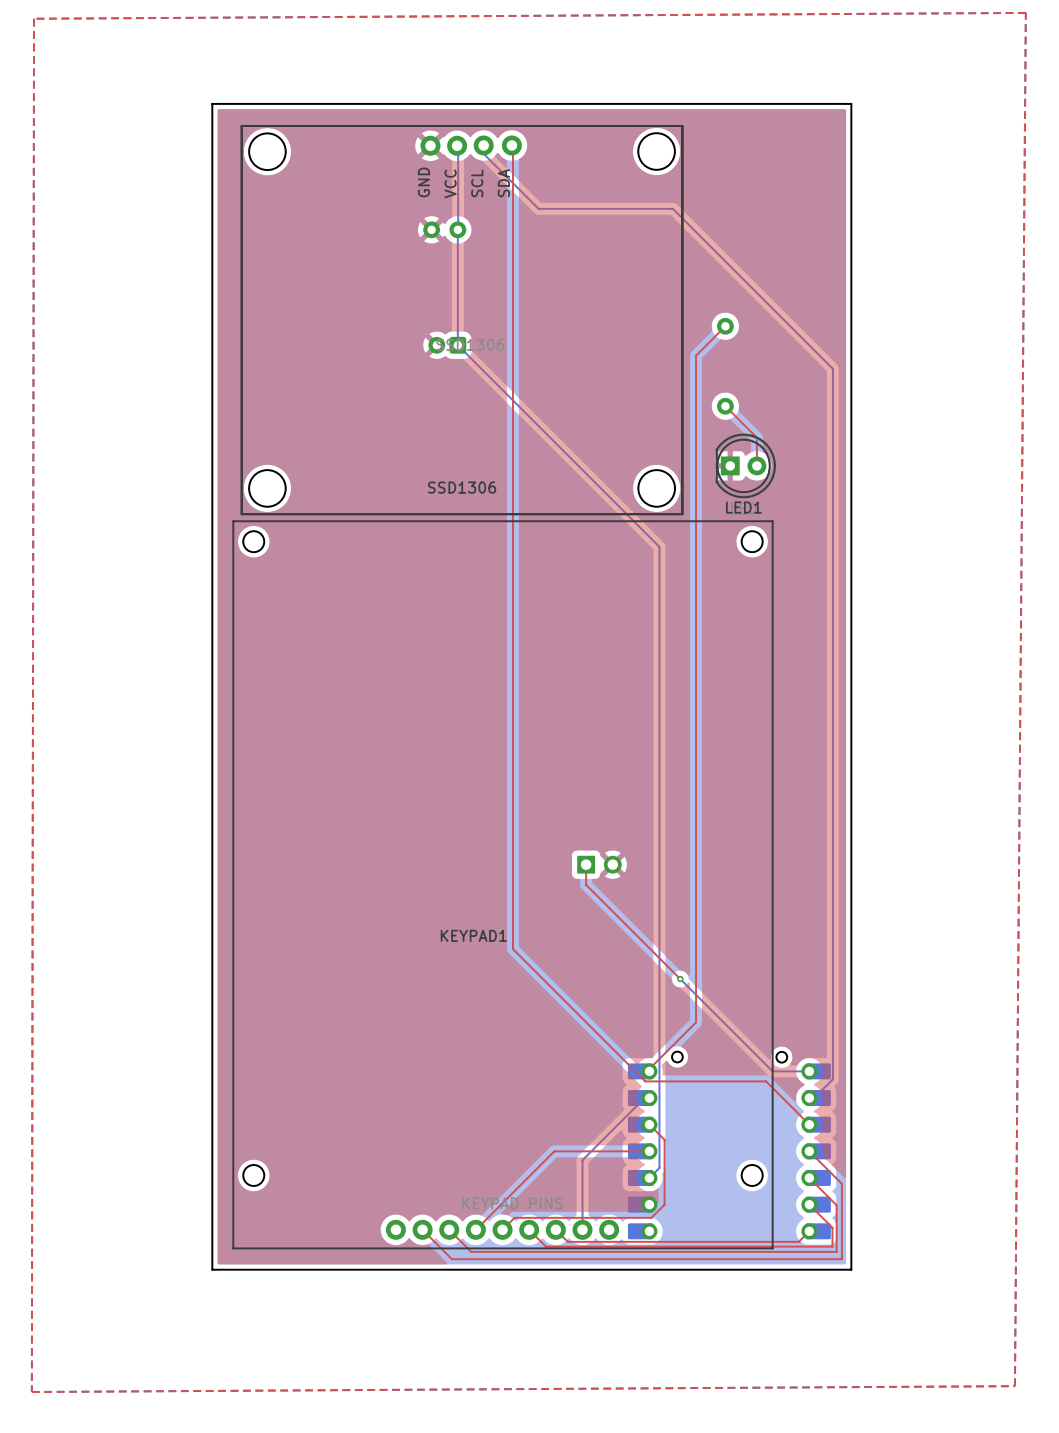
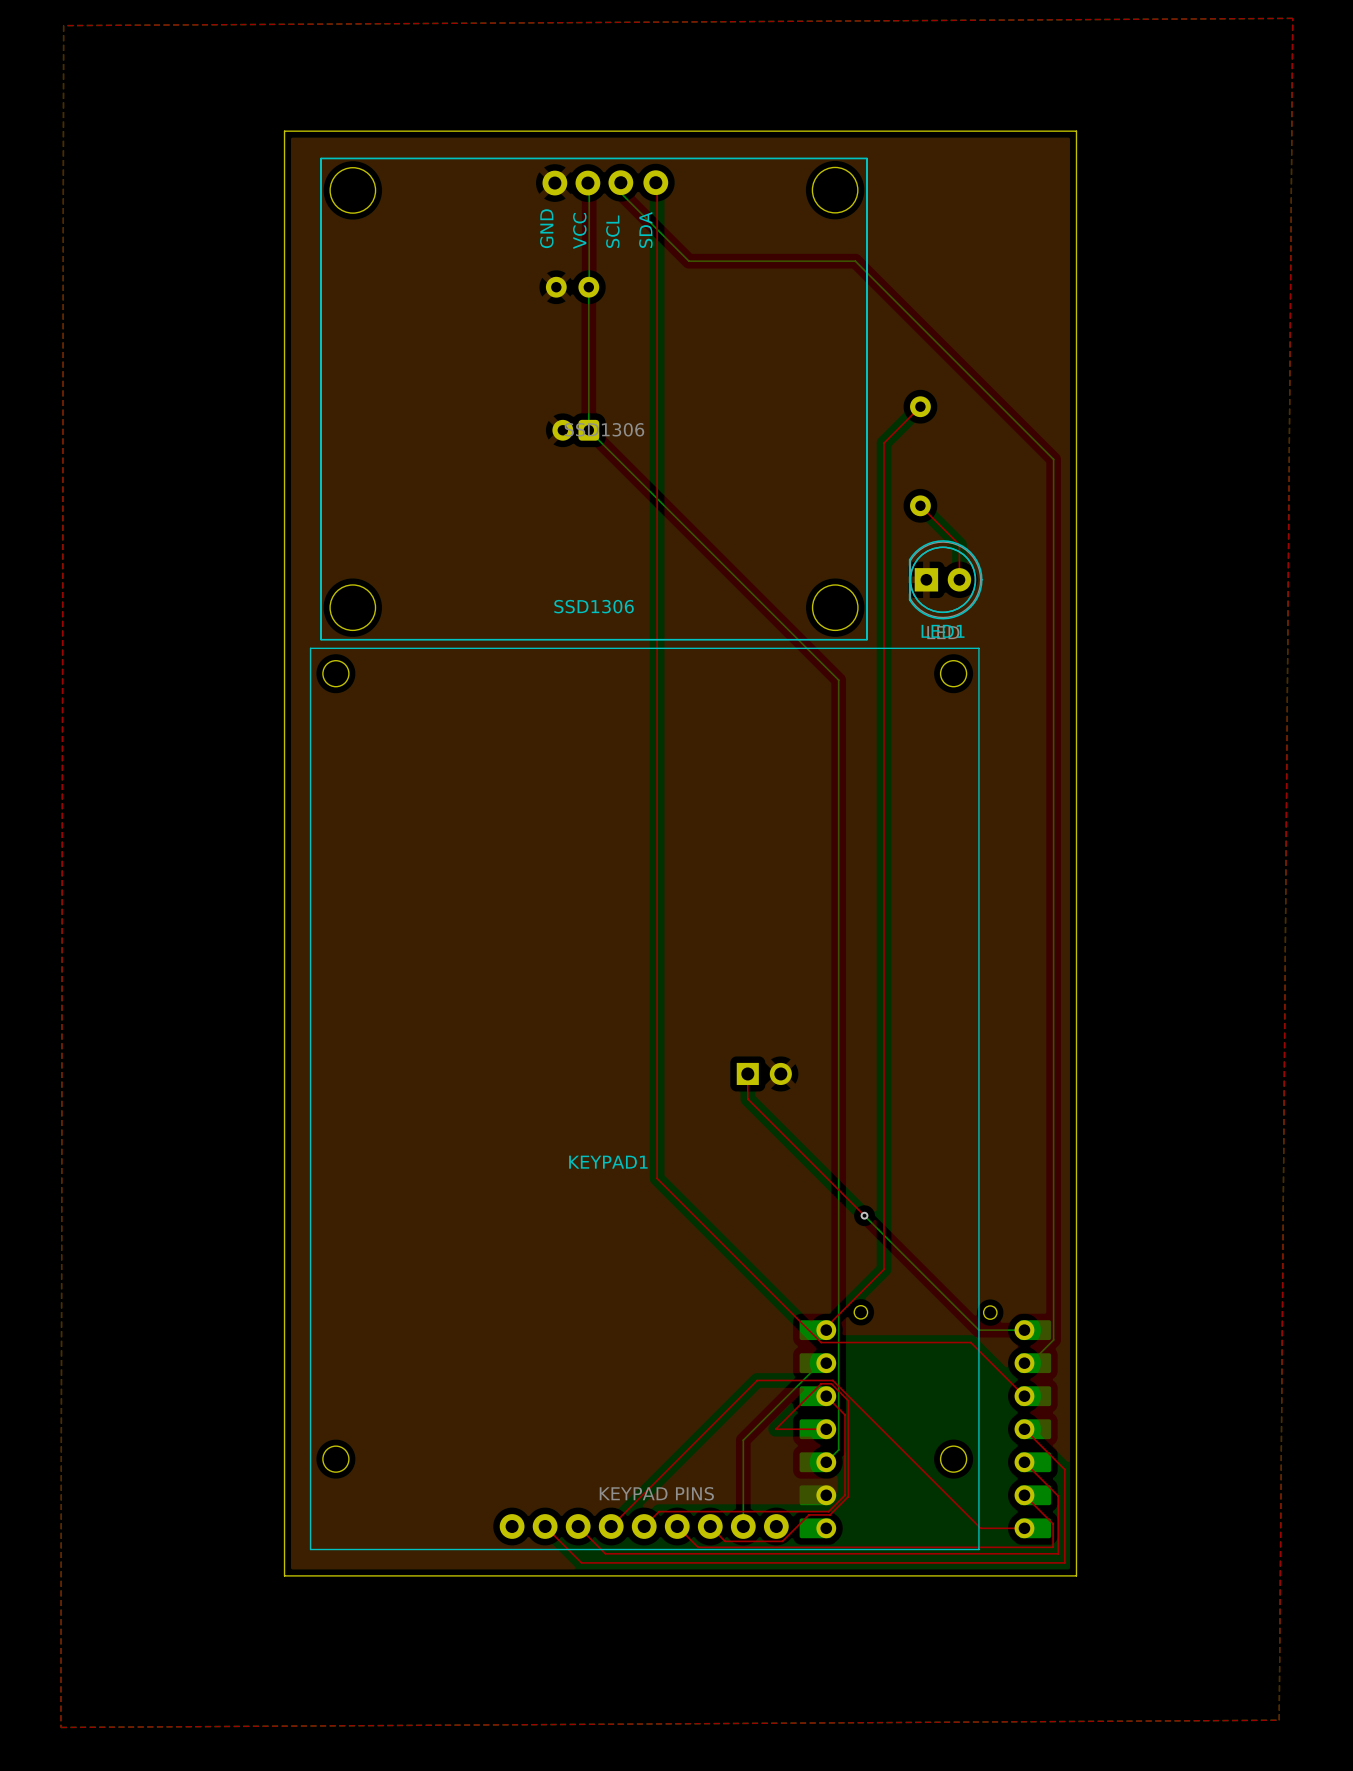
top track: (554, 1151) (608, 1151) -> (782, 1541) (808, 1514) (830, 1514) (848, 1496) (848, 1400) (831, 1383) (821, 1383) (775, 1429)
top track: (809, 1231) (798, 1241) (614, 1241) -> (1024, 1528) (980, 1528) (832, 1380) (757, 1380) (708, 1429)

